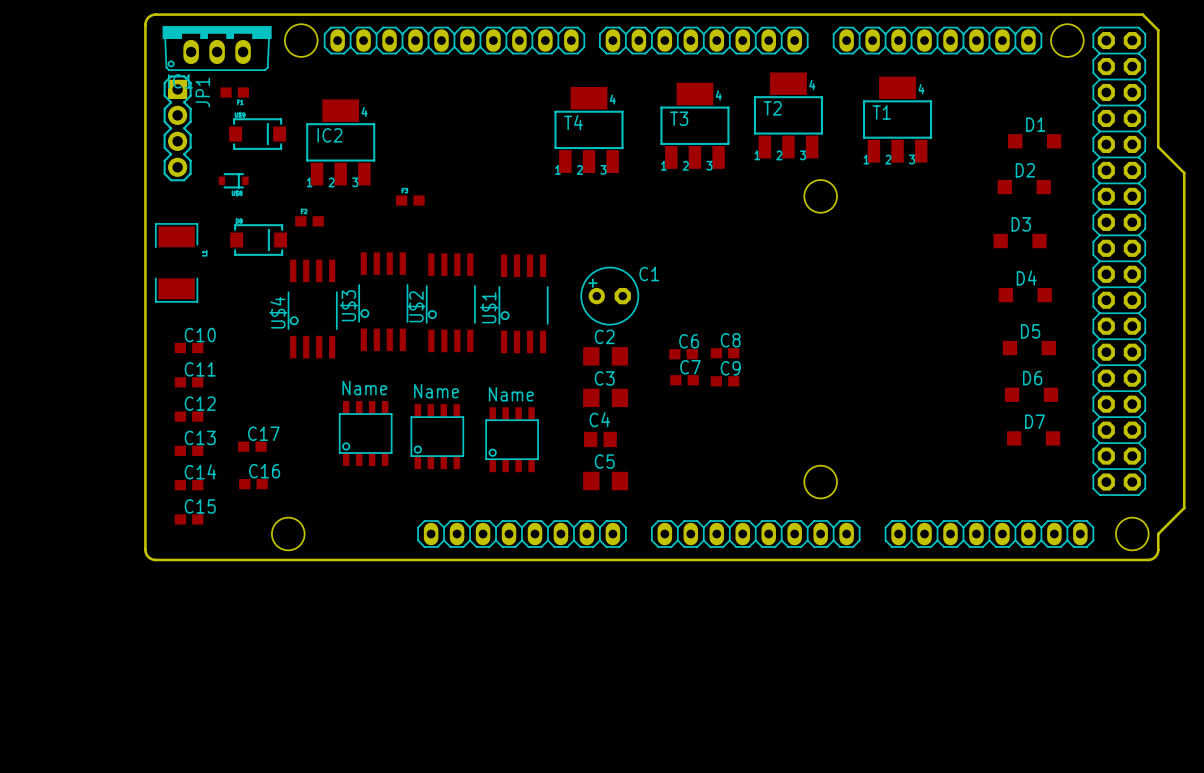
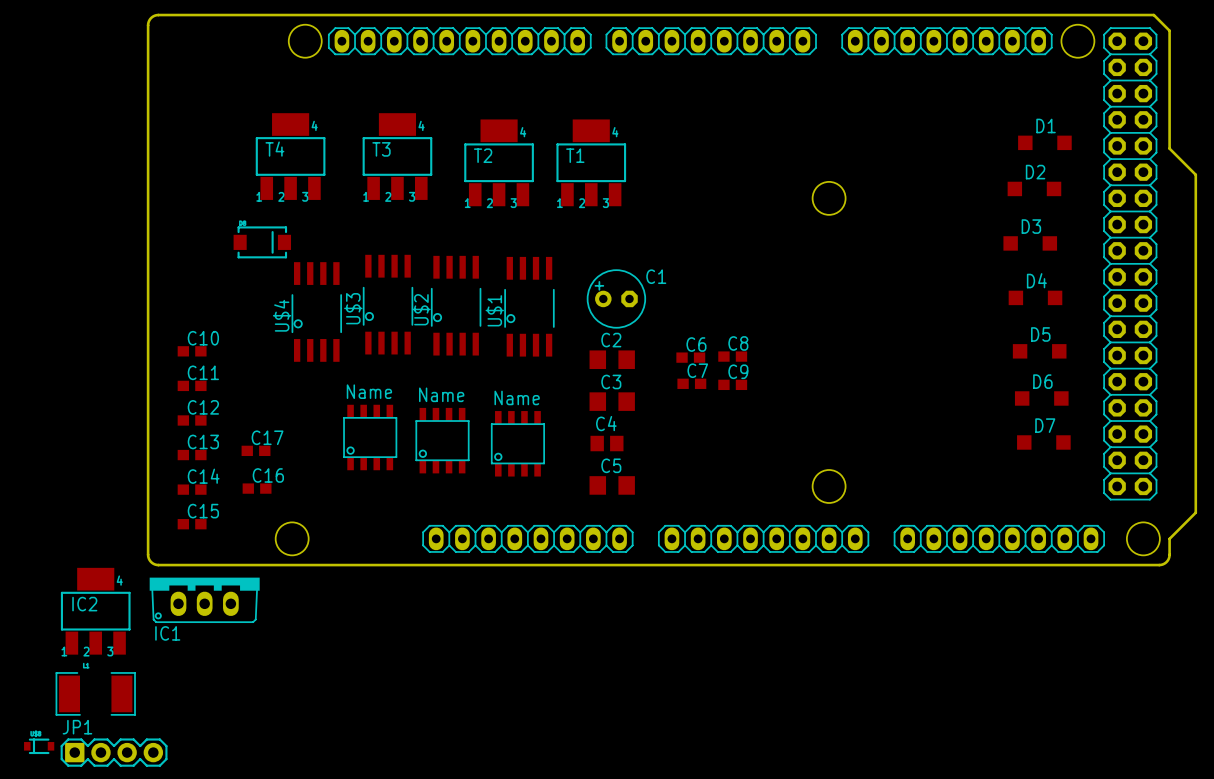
IC1 position: (217, 48) -> (204, 600)
part: (234, 92) -> none
T2 position: (788, 115) -> (499, 162)
T1 position: (897, 119) -> (591, 162)
T3 position: (694, 125) -> (397, 156)
JP1 rotation: 0° (177, 128) -> 90° counterclockwise (114, 752)
JP1 position: (177, 128) -> (114, 752)
T4 position: (589, 129) -> (290, 156)
part: (257, 134) -> none
IC2 position: (340, 142) -> (95, 611)
part rotation: 0° (233, 180) -> 180° (39, 746)
part position: (233, 180) -> (39, 746)
part: (410, 200) -> none
part: (309, 221) -> none
part rotation: 0° (176, 262) -> 90° counterclockwise (95, 693)
part position: (176, 262) -> (95, 693)

